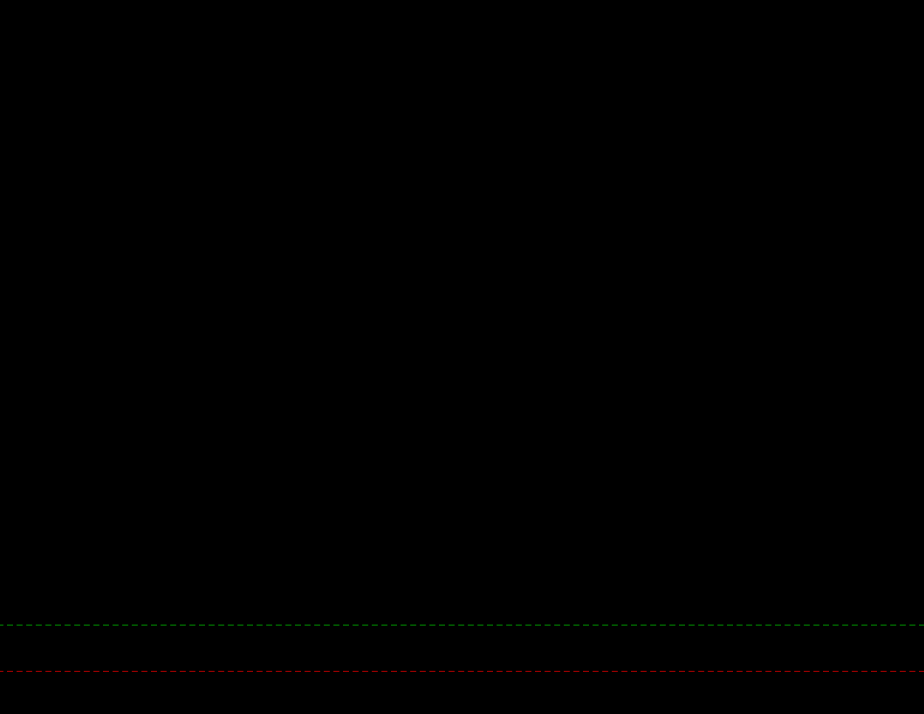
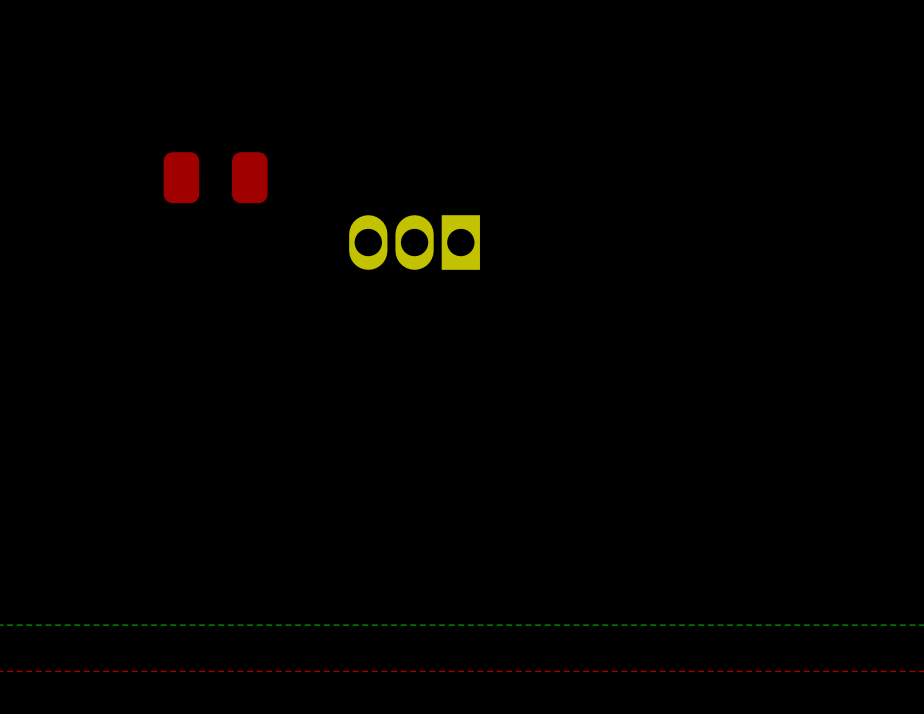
part: none -> (215, 177)
part: none -> (414, 242)

